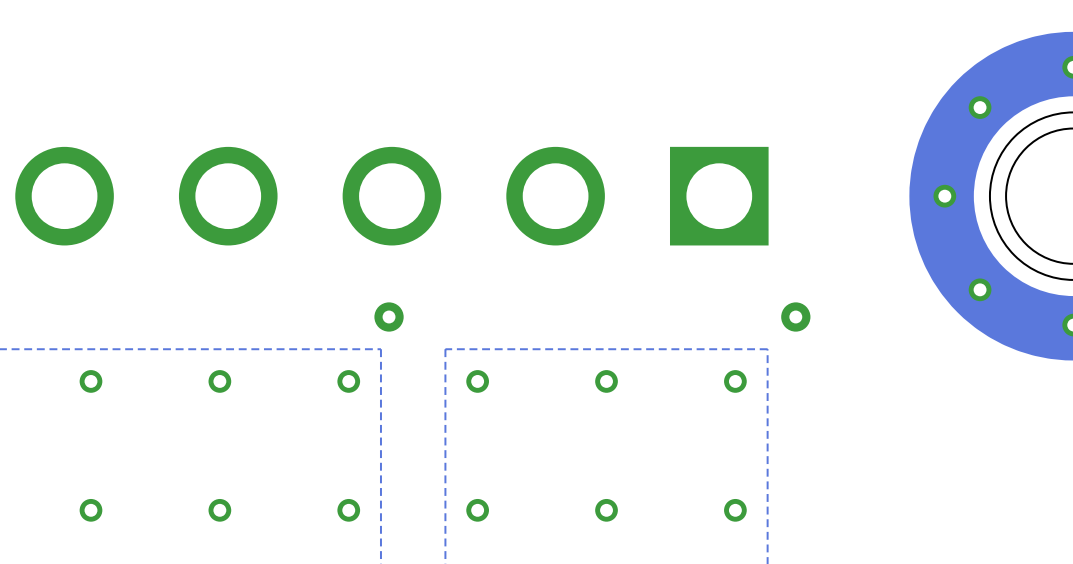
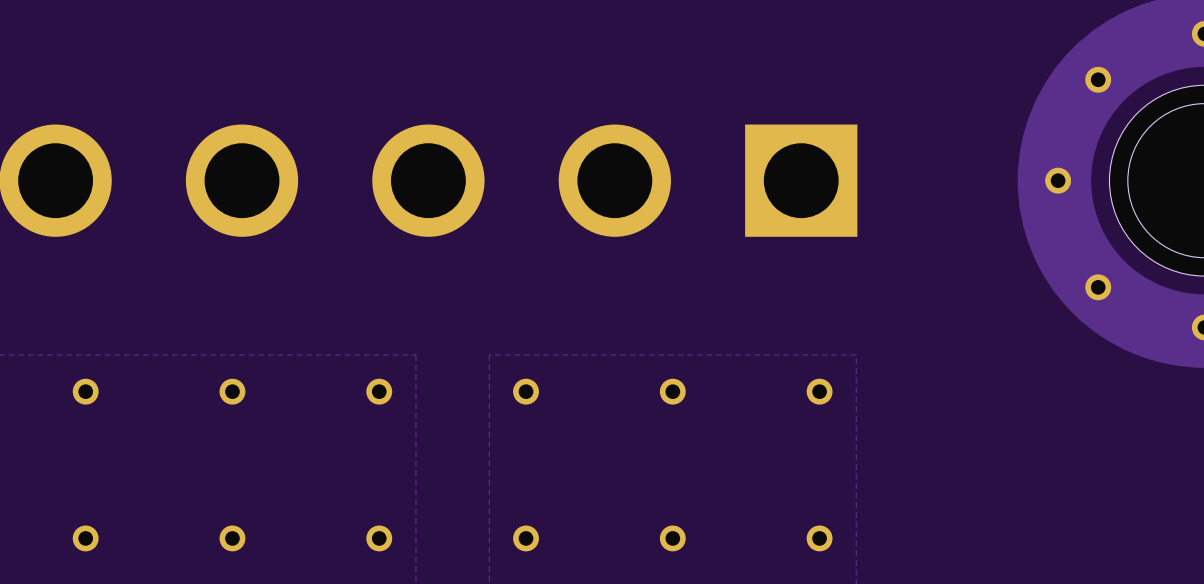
via: (389, 317) -> none
via: (795, 317) -> none

